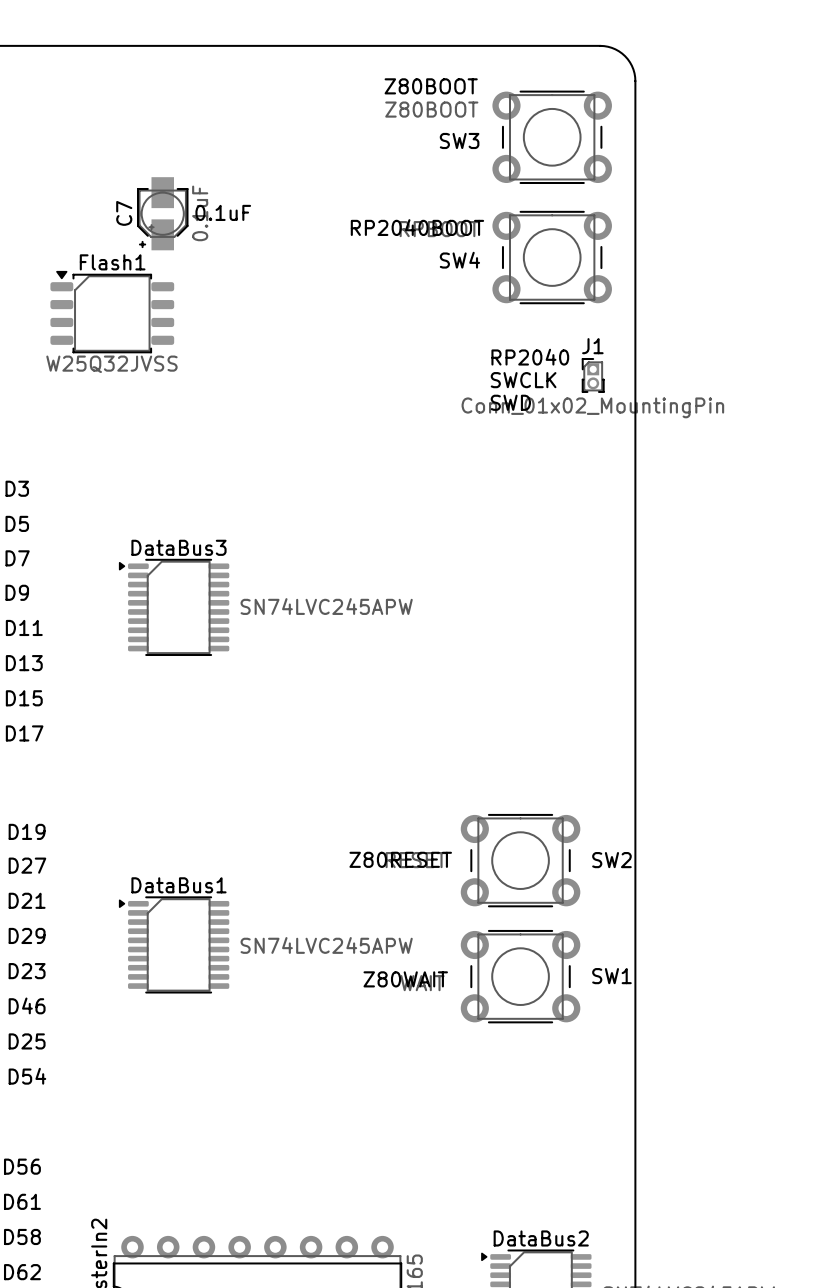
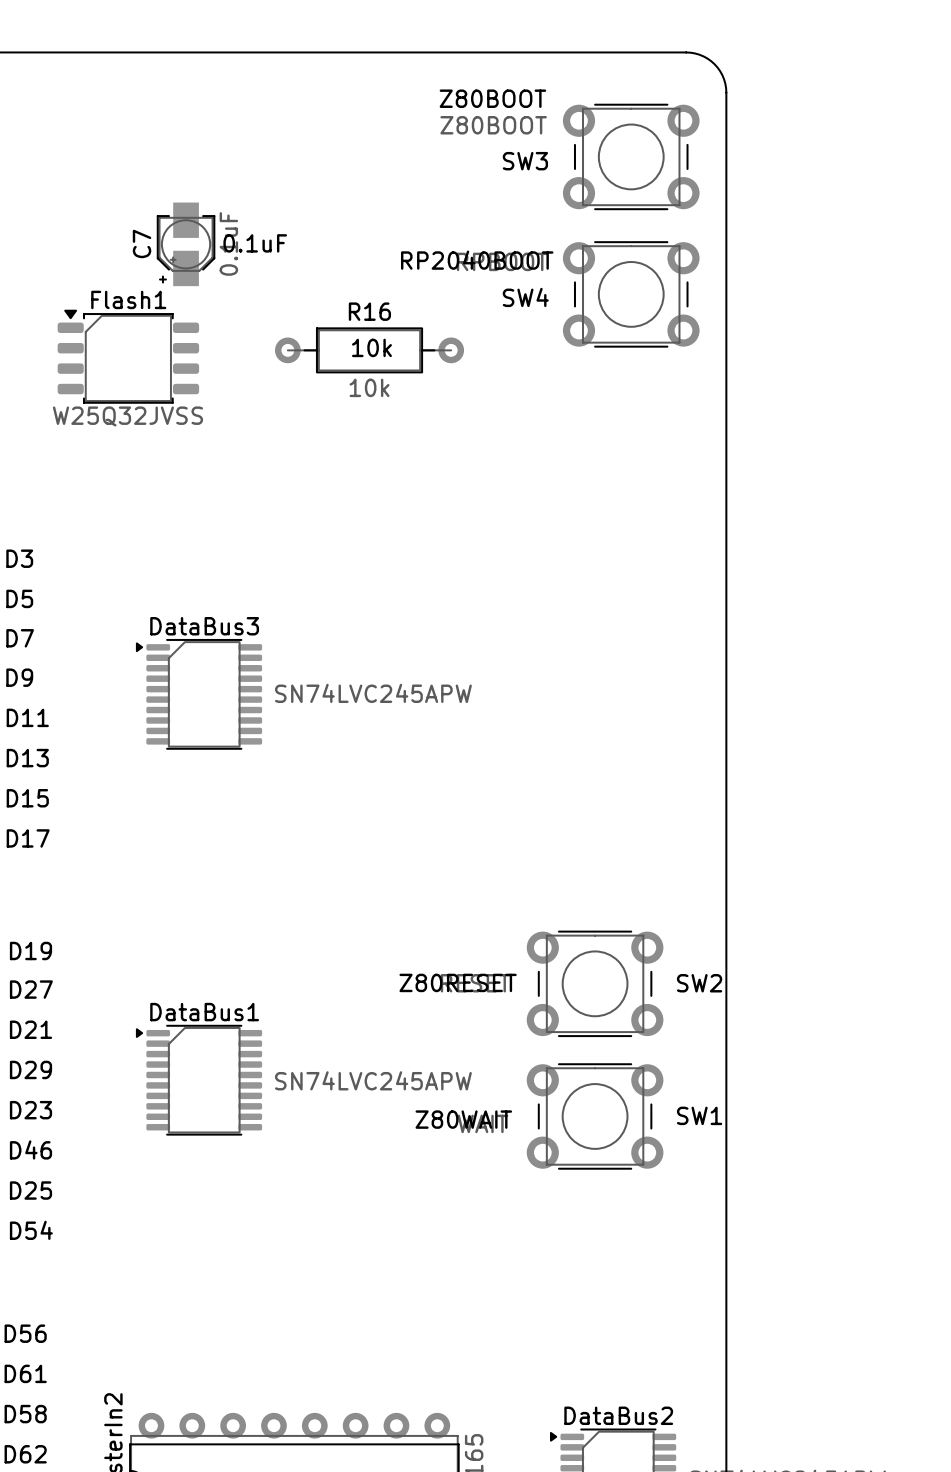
text: none -> 10k (371, 347)
R16: none -> 10k (369, 350)
text: RP2040 (530, 357) -> none
J1: Conn_01x02_MountingPin (593, 375) -> none
text: SWCLK (523, 380) -> none
text: SWD (510, 402) -> none

